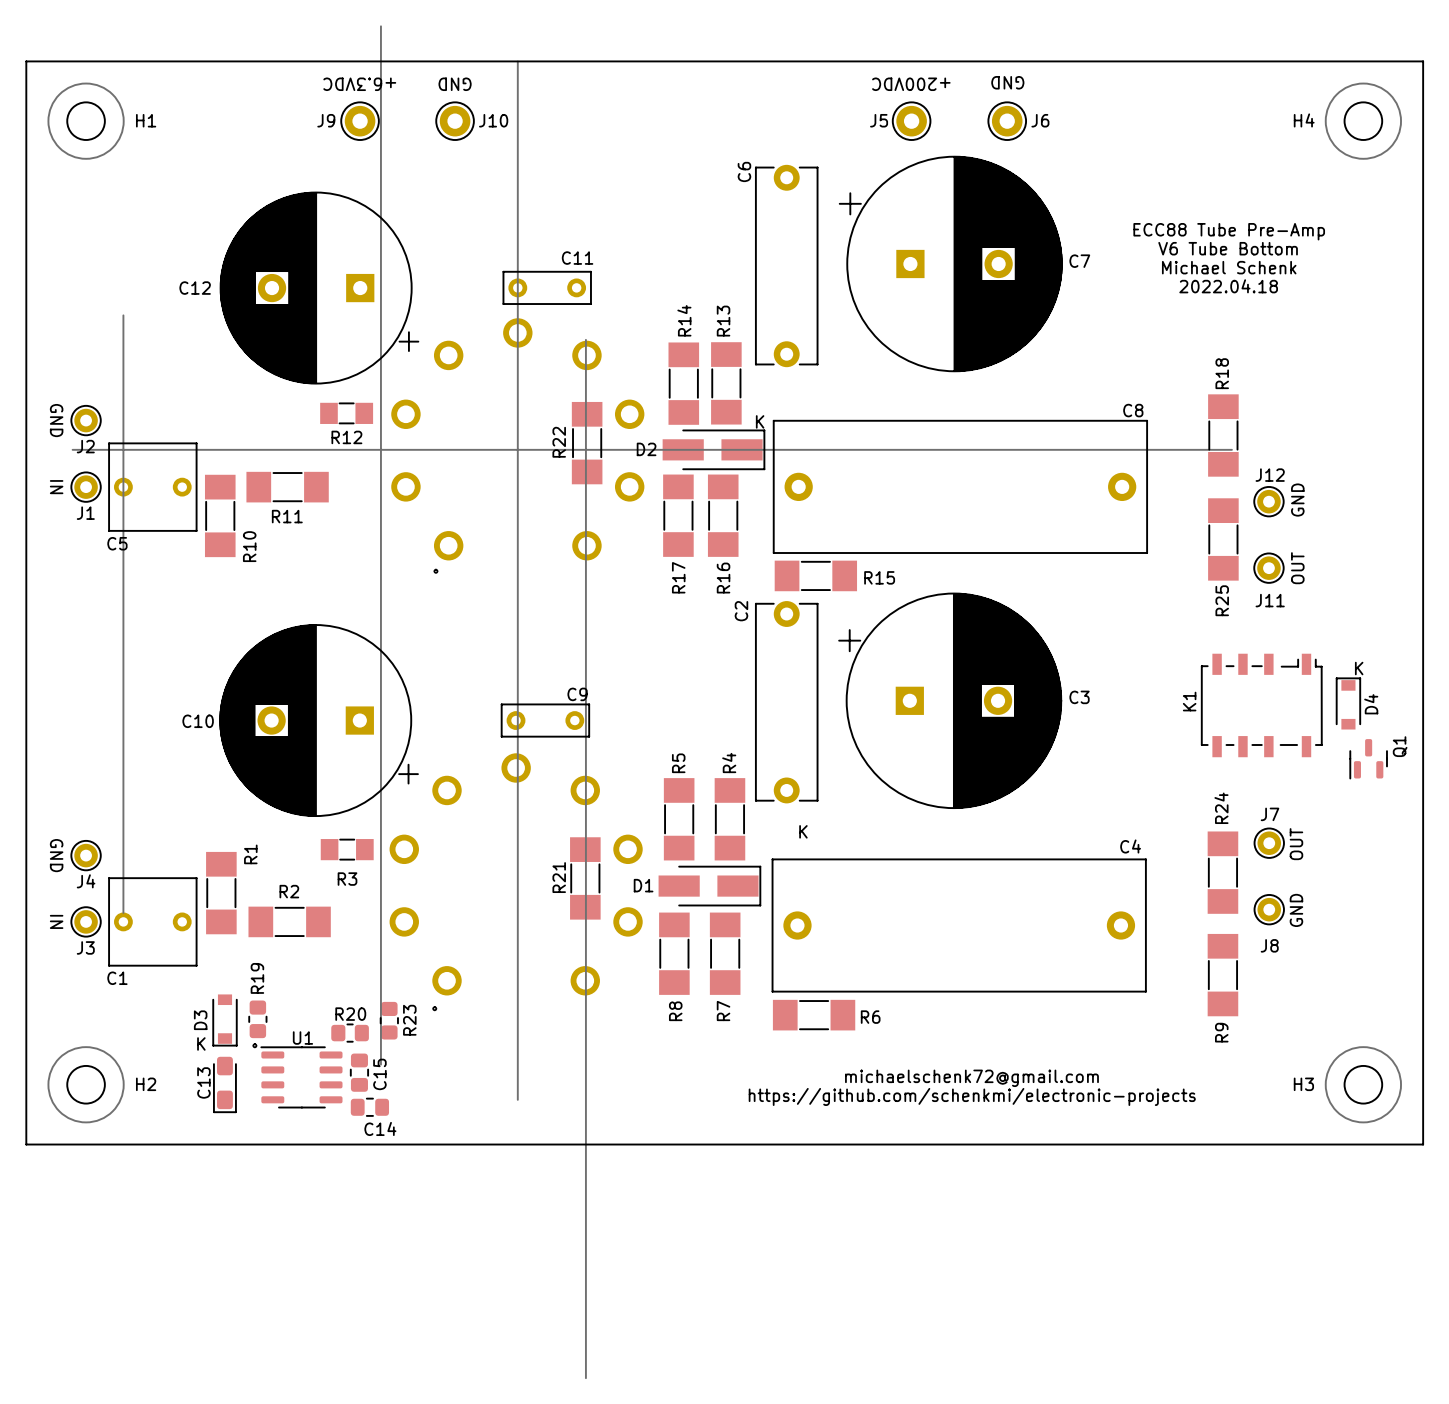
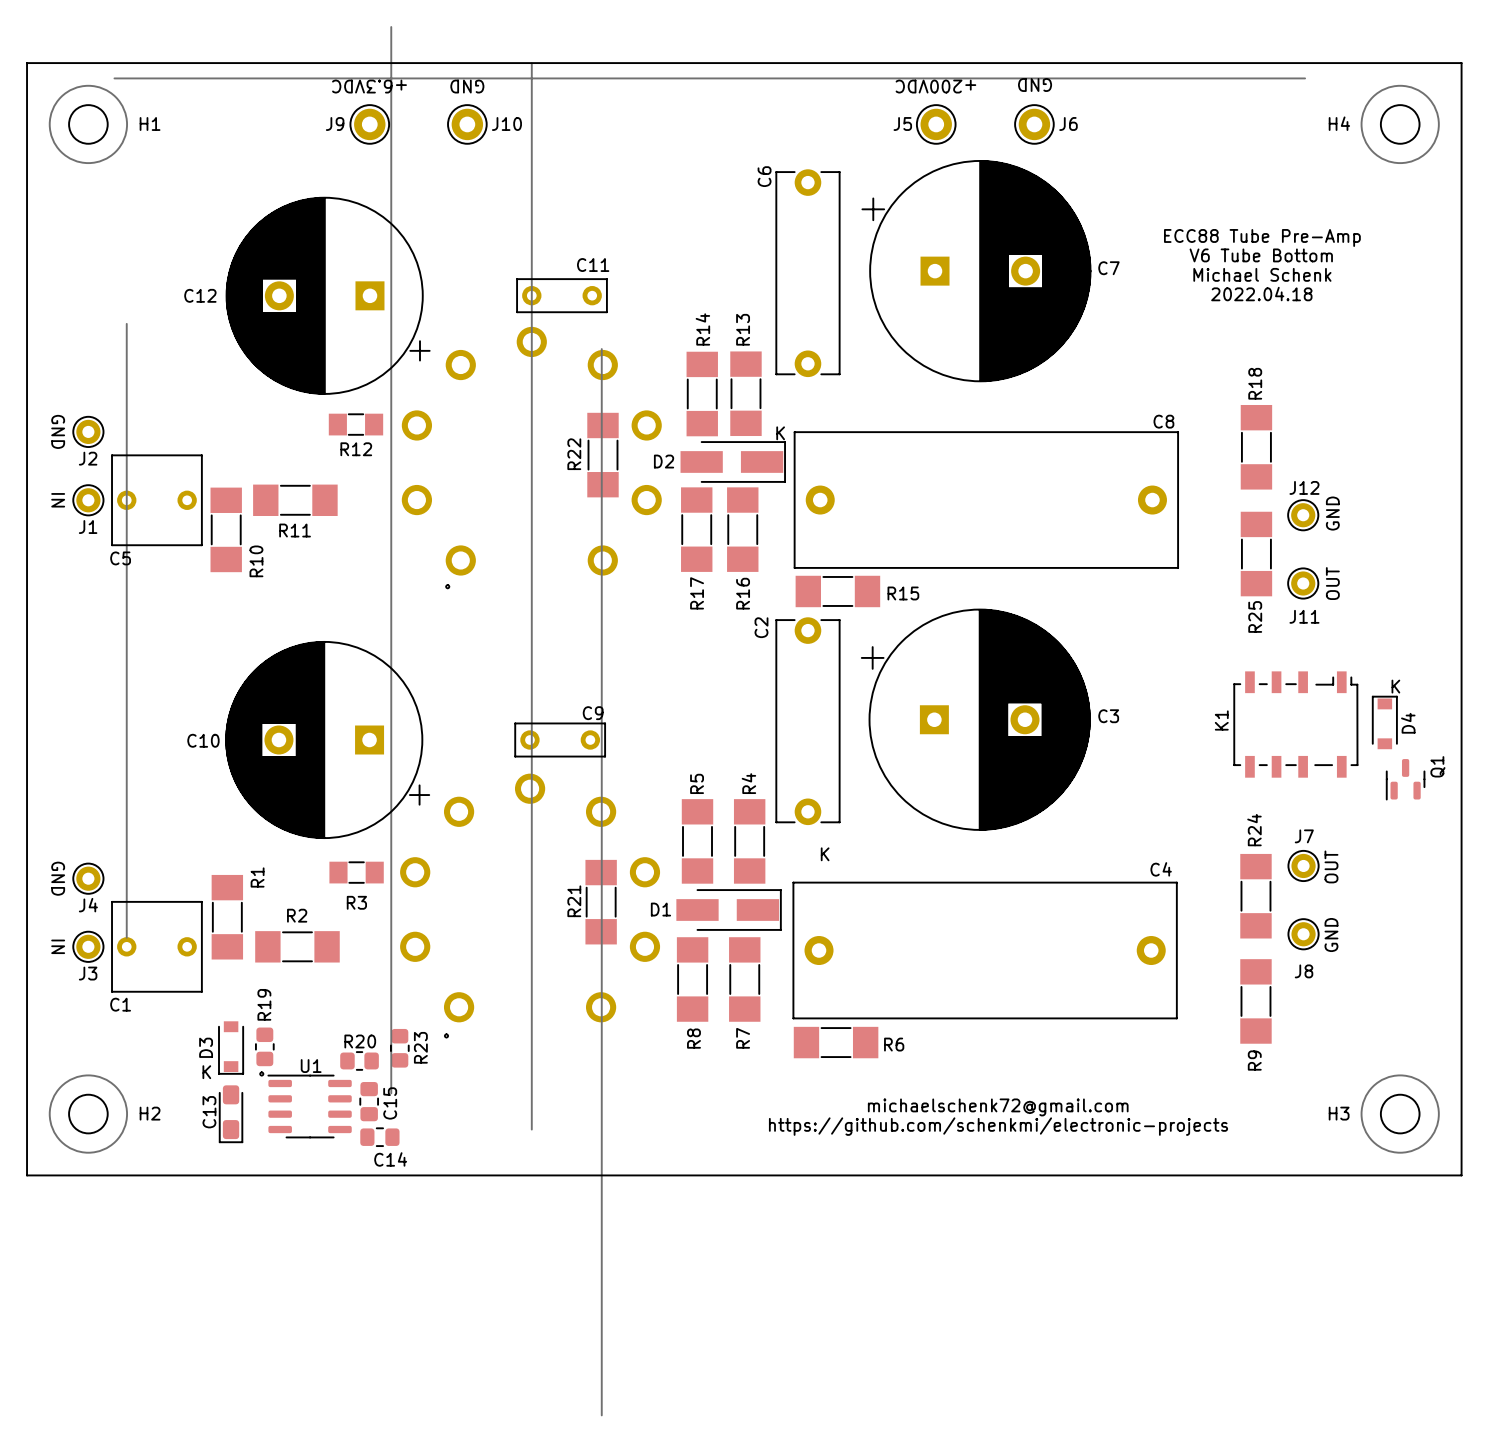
line: none -> (114, 78) (1305, 78)
line: (72, 449) (1231, 449) -> none

